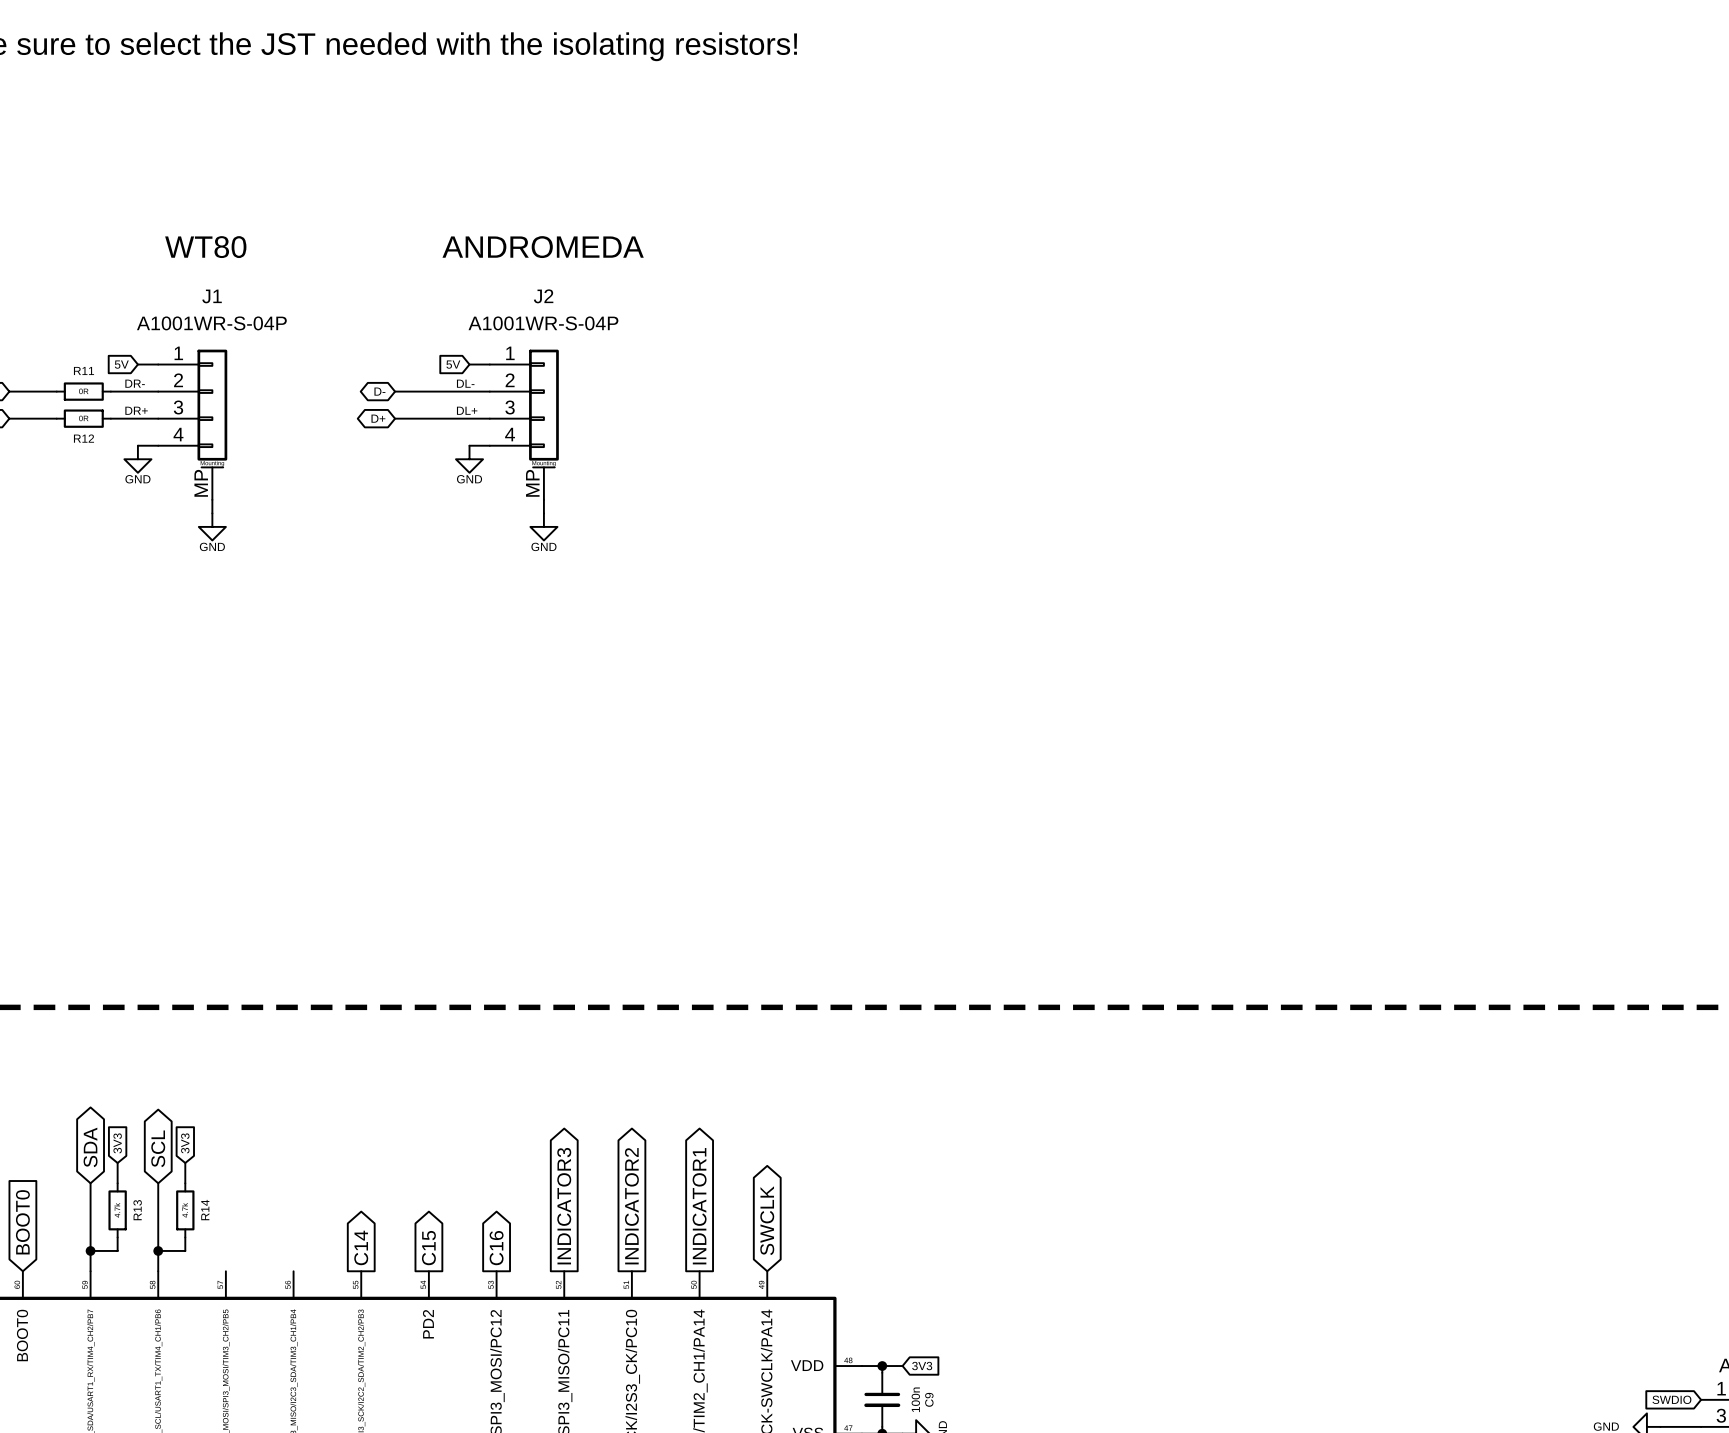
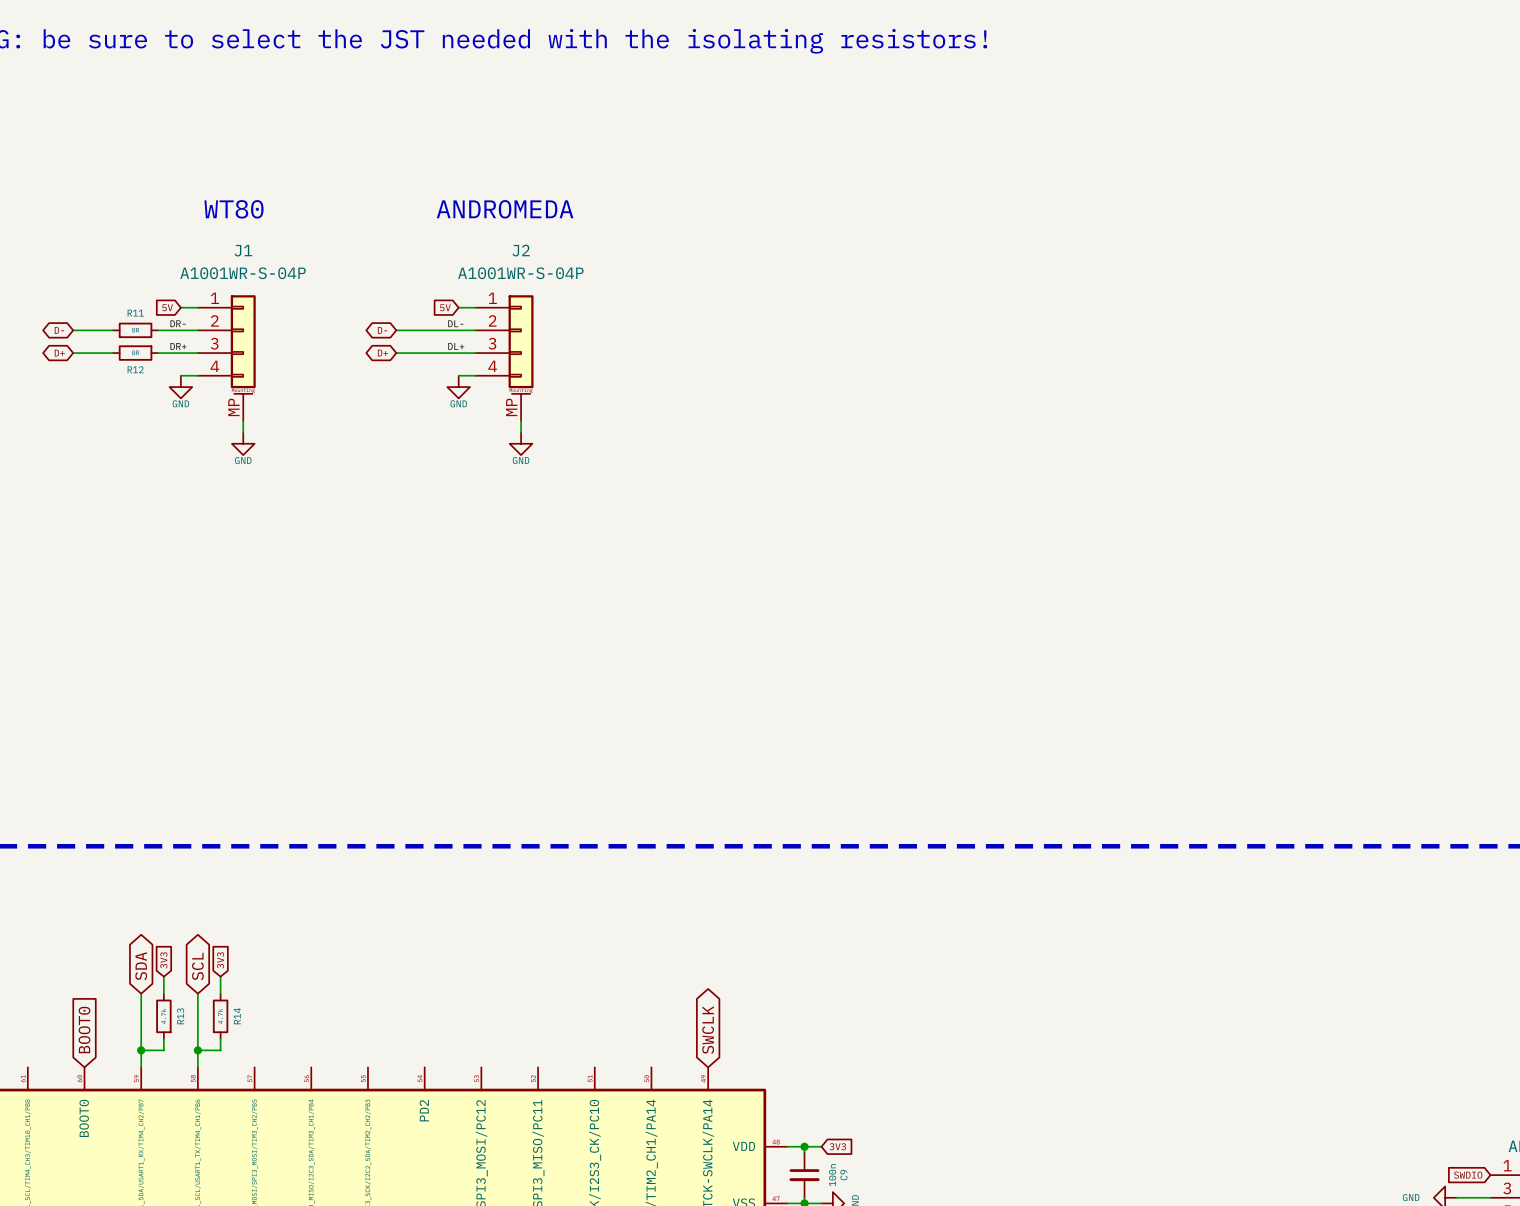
global label: INDICATOR3 (564, 1206) -> none
global label: INDICATOR2 (631, 1206) -> none
global label: INDICATOR1 (699, 1206) -> none
global label: C14 (361, 1247) -> none
global label: C15 (428, 1248) -> none
global label: C16 (496, 1248) -> none

